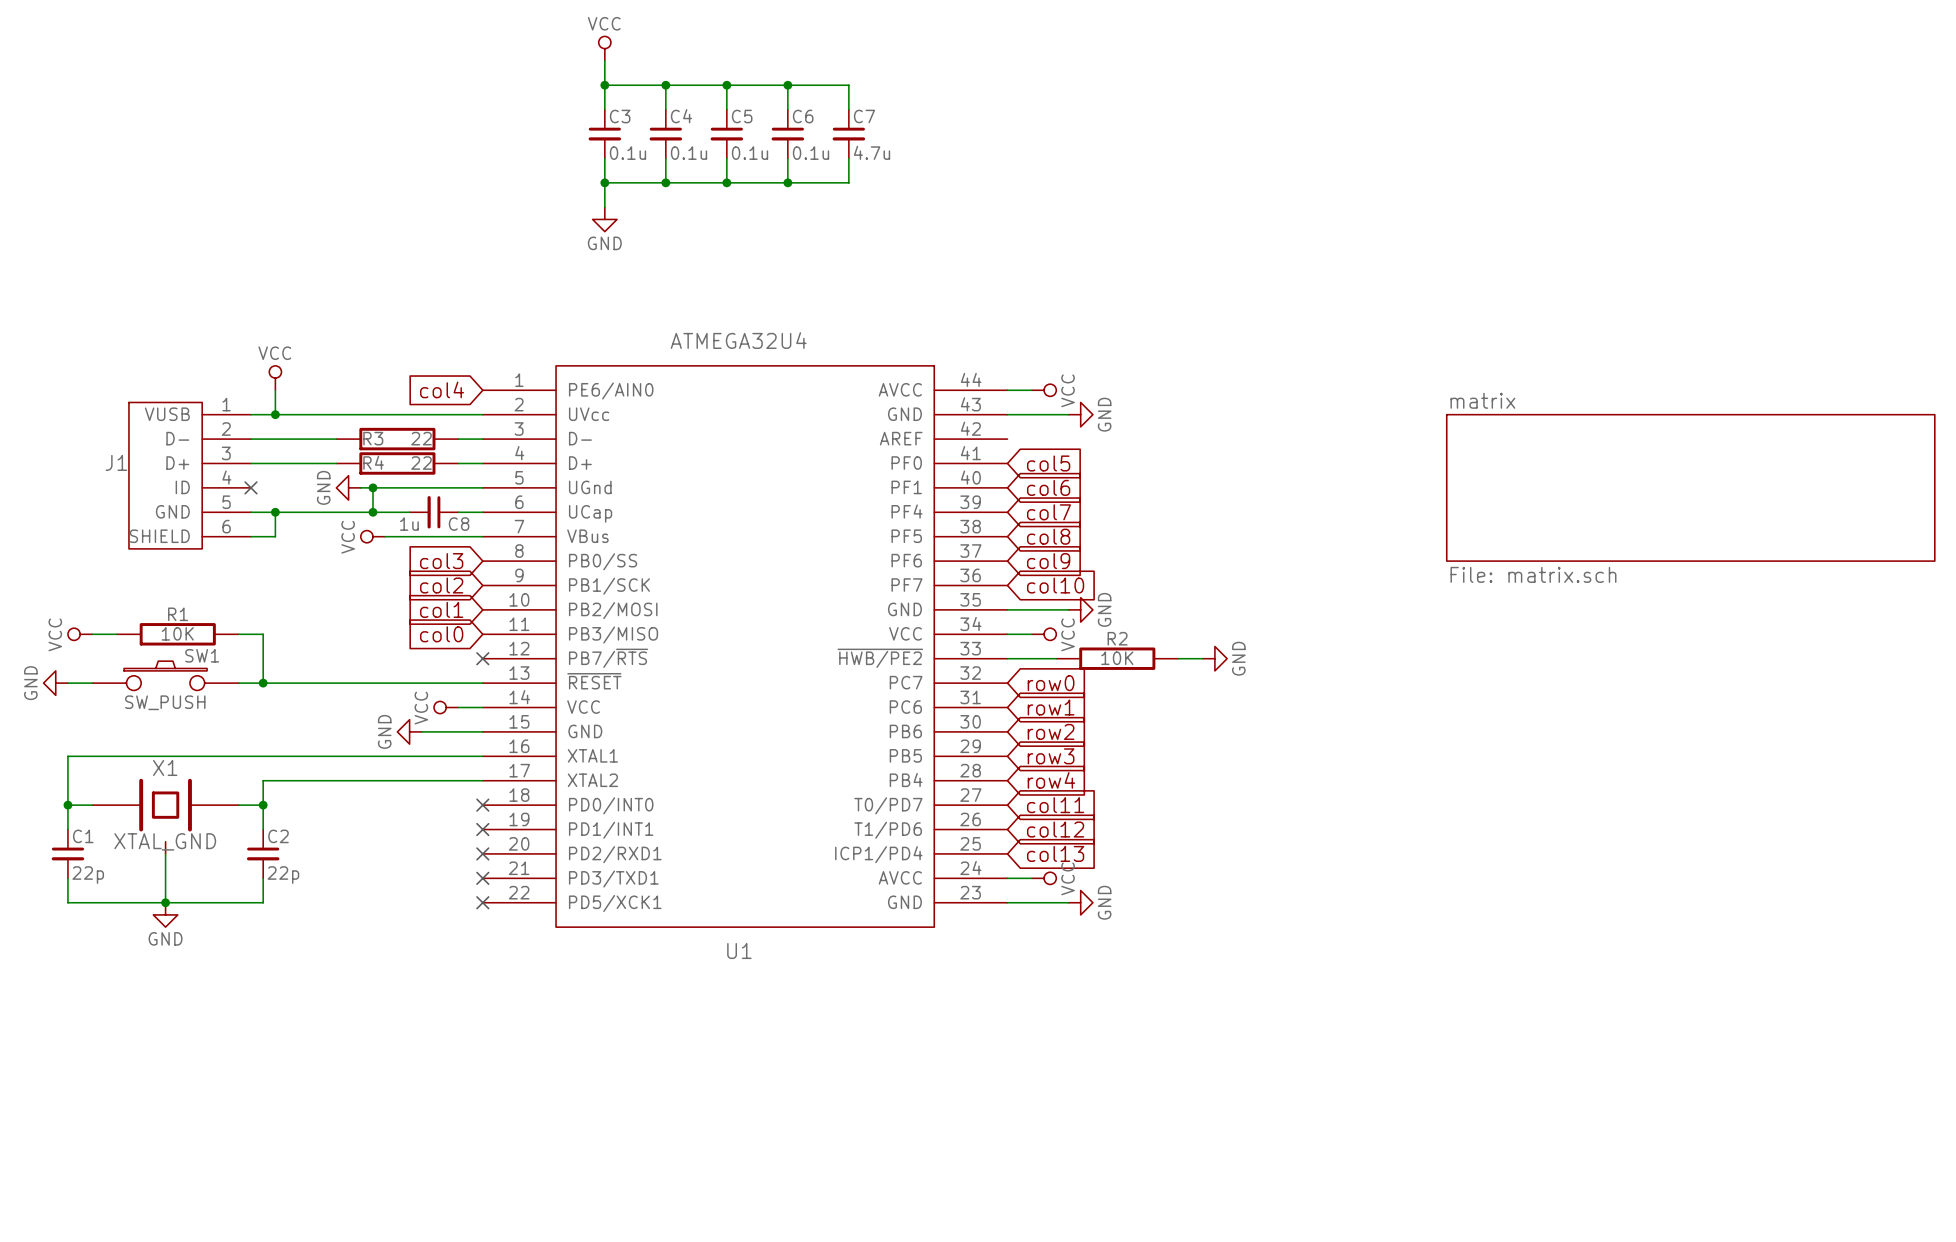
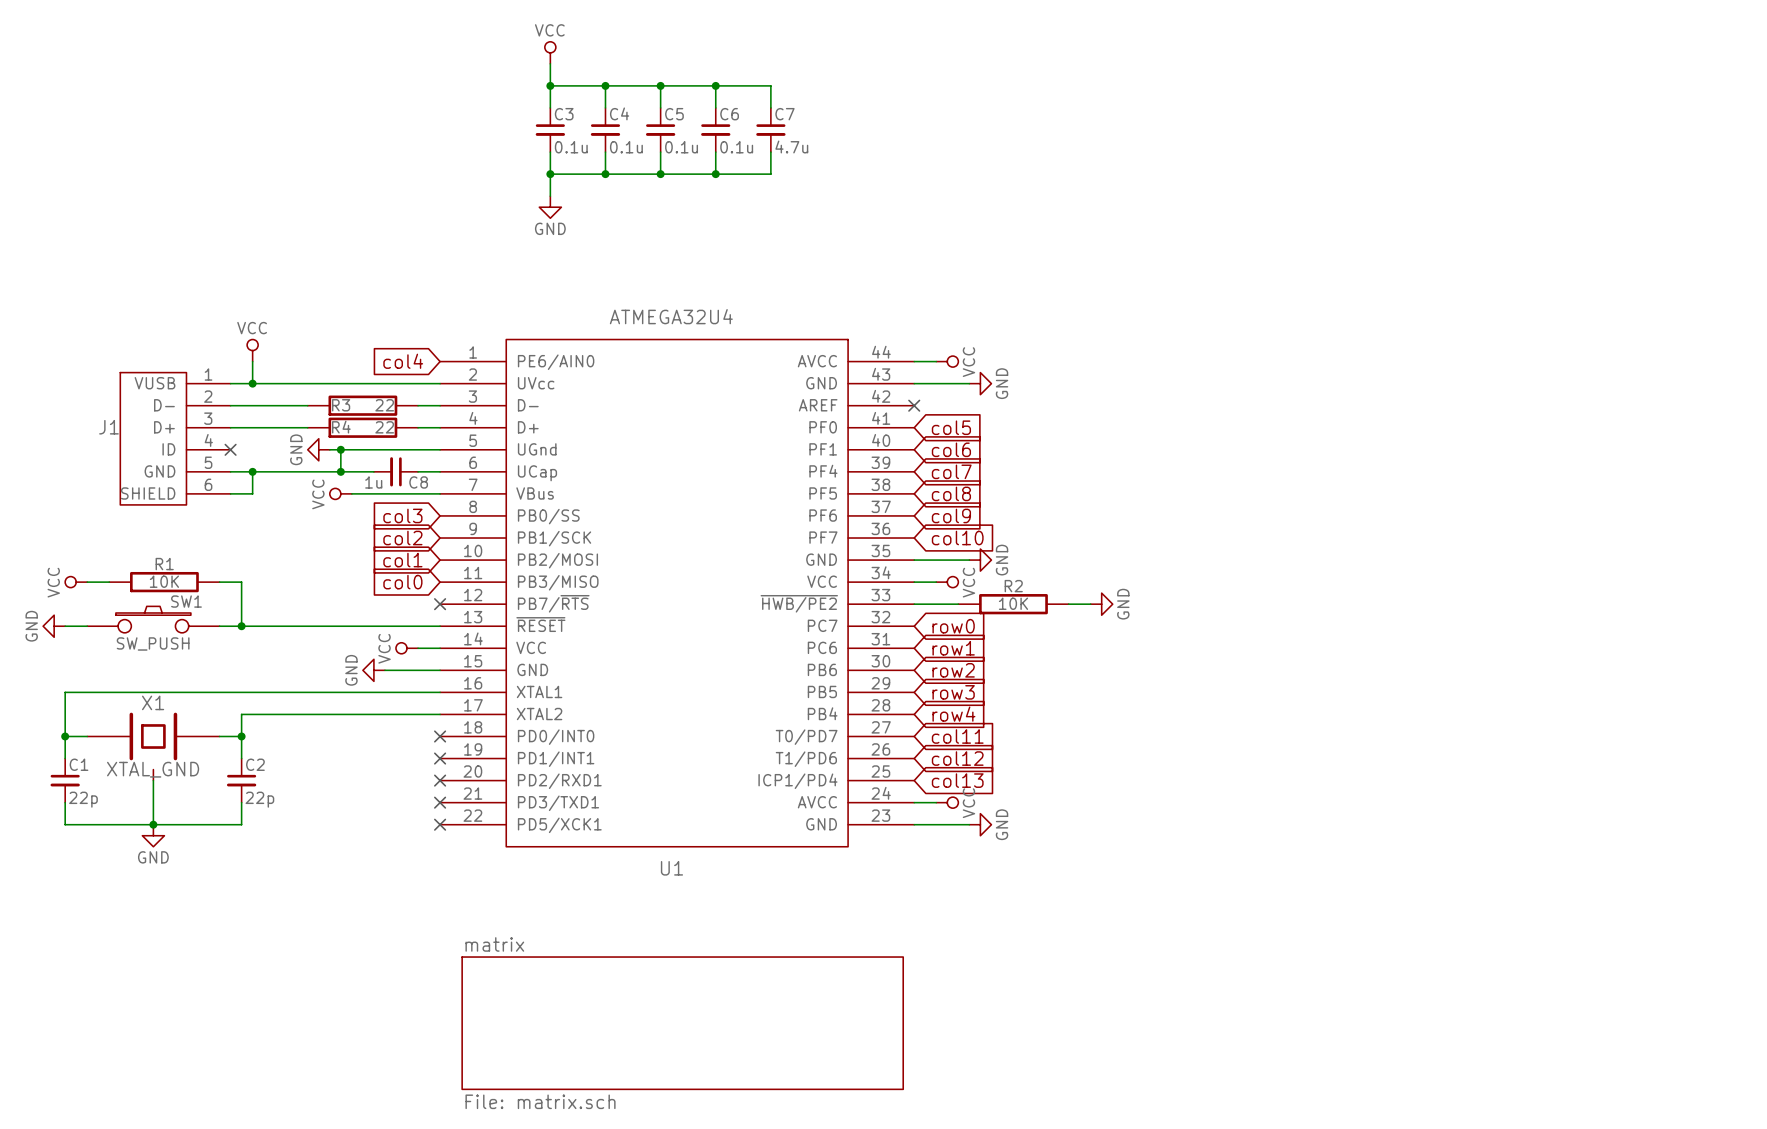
no-connect mark: none -> (914, 405)
sheet matrix: File: matrix.sch (1690, 487) -> none
sheet matrix: none -> File: matrix.sch (682, 1023)

